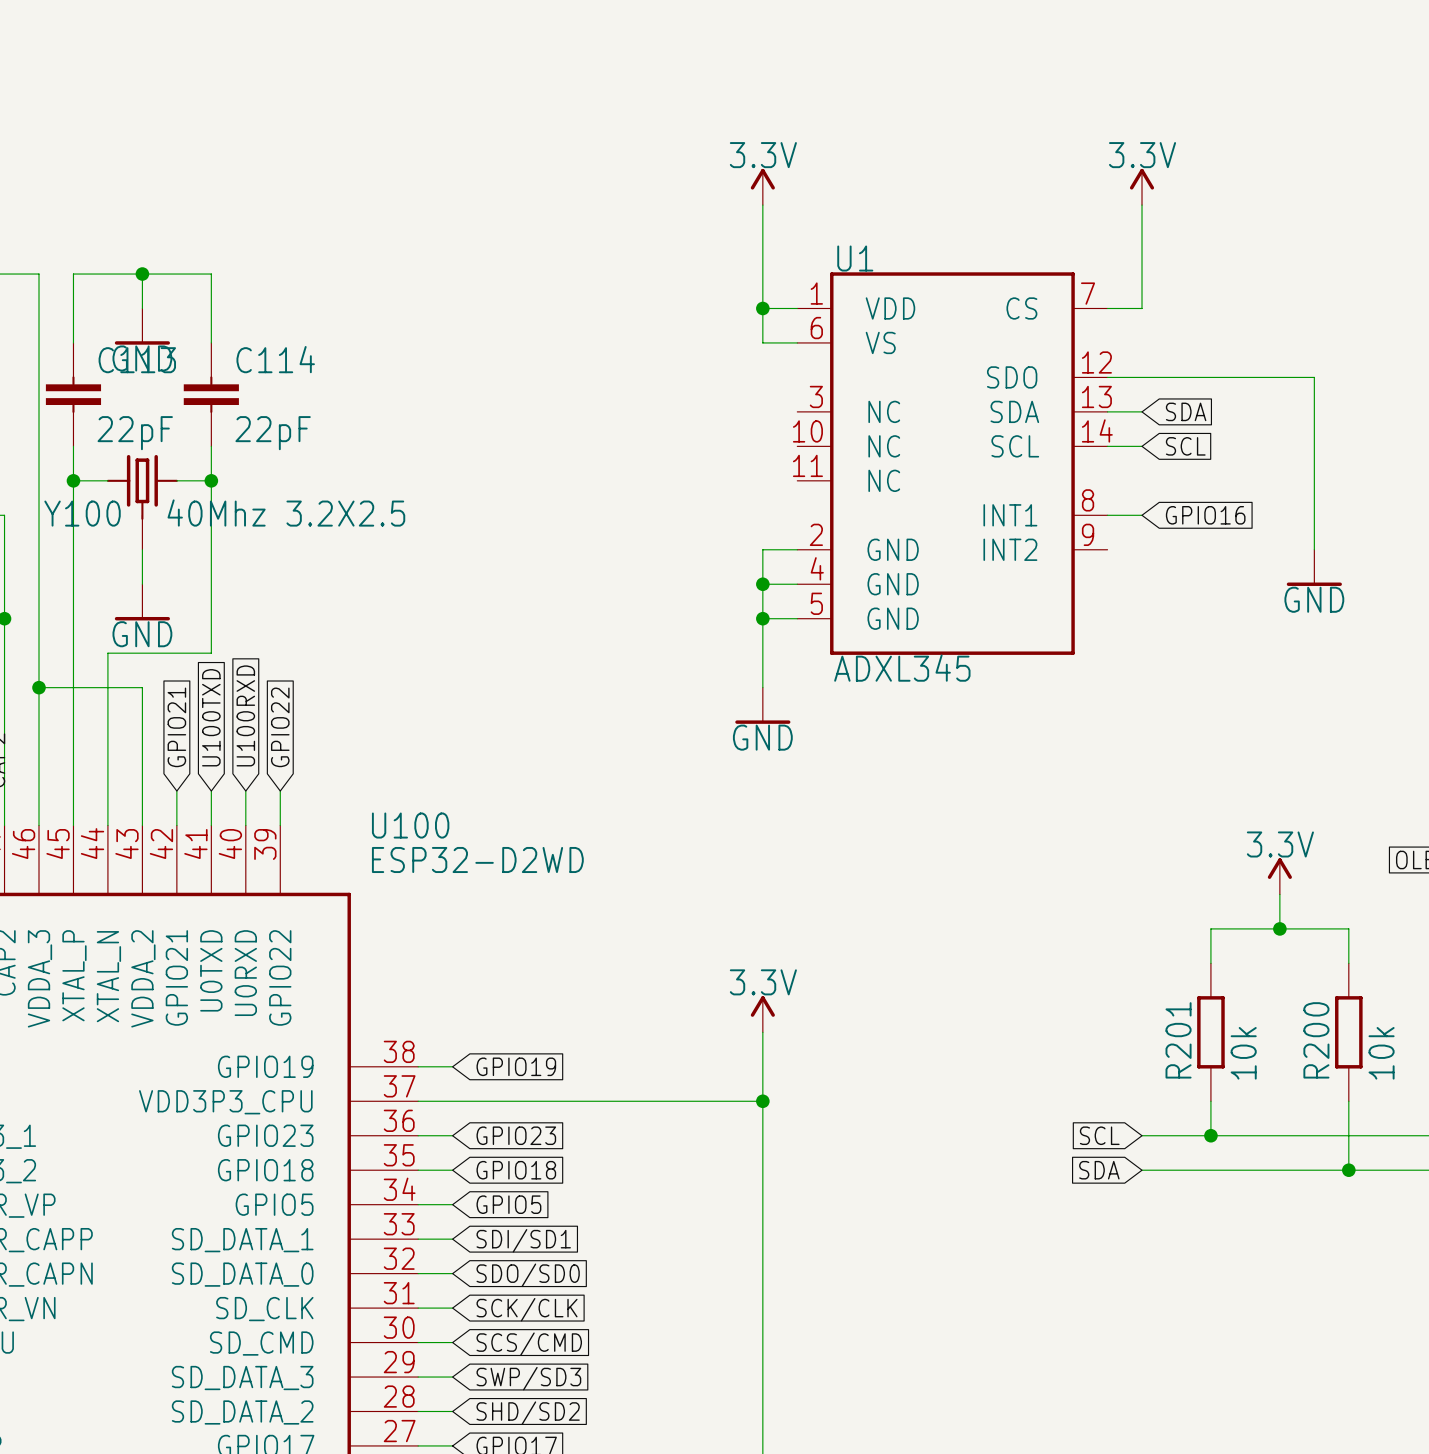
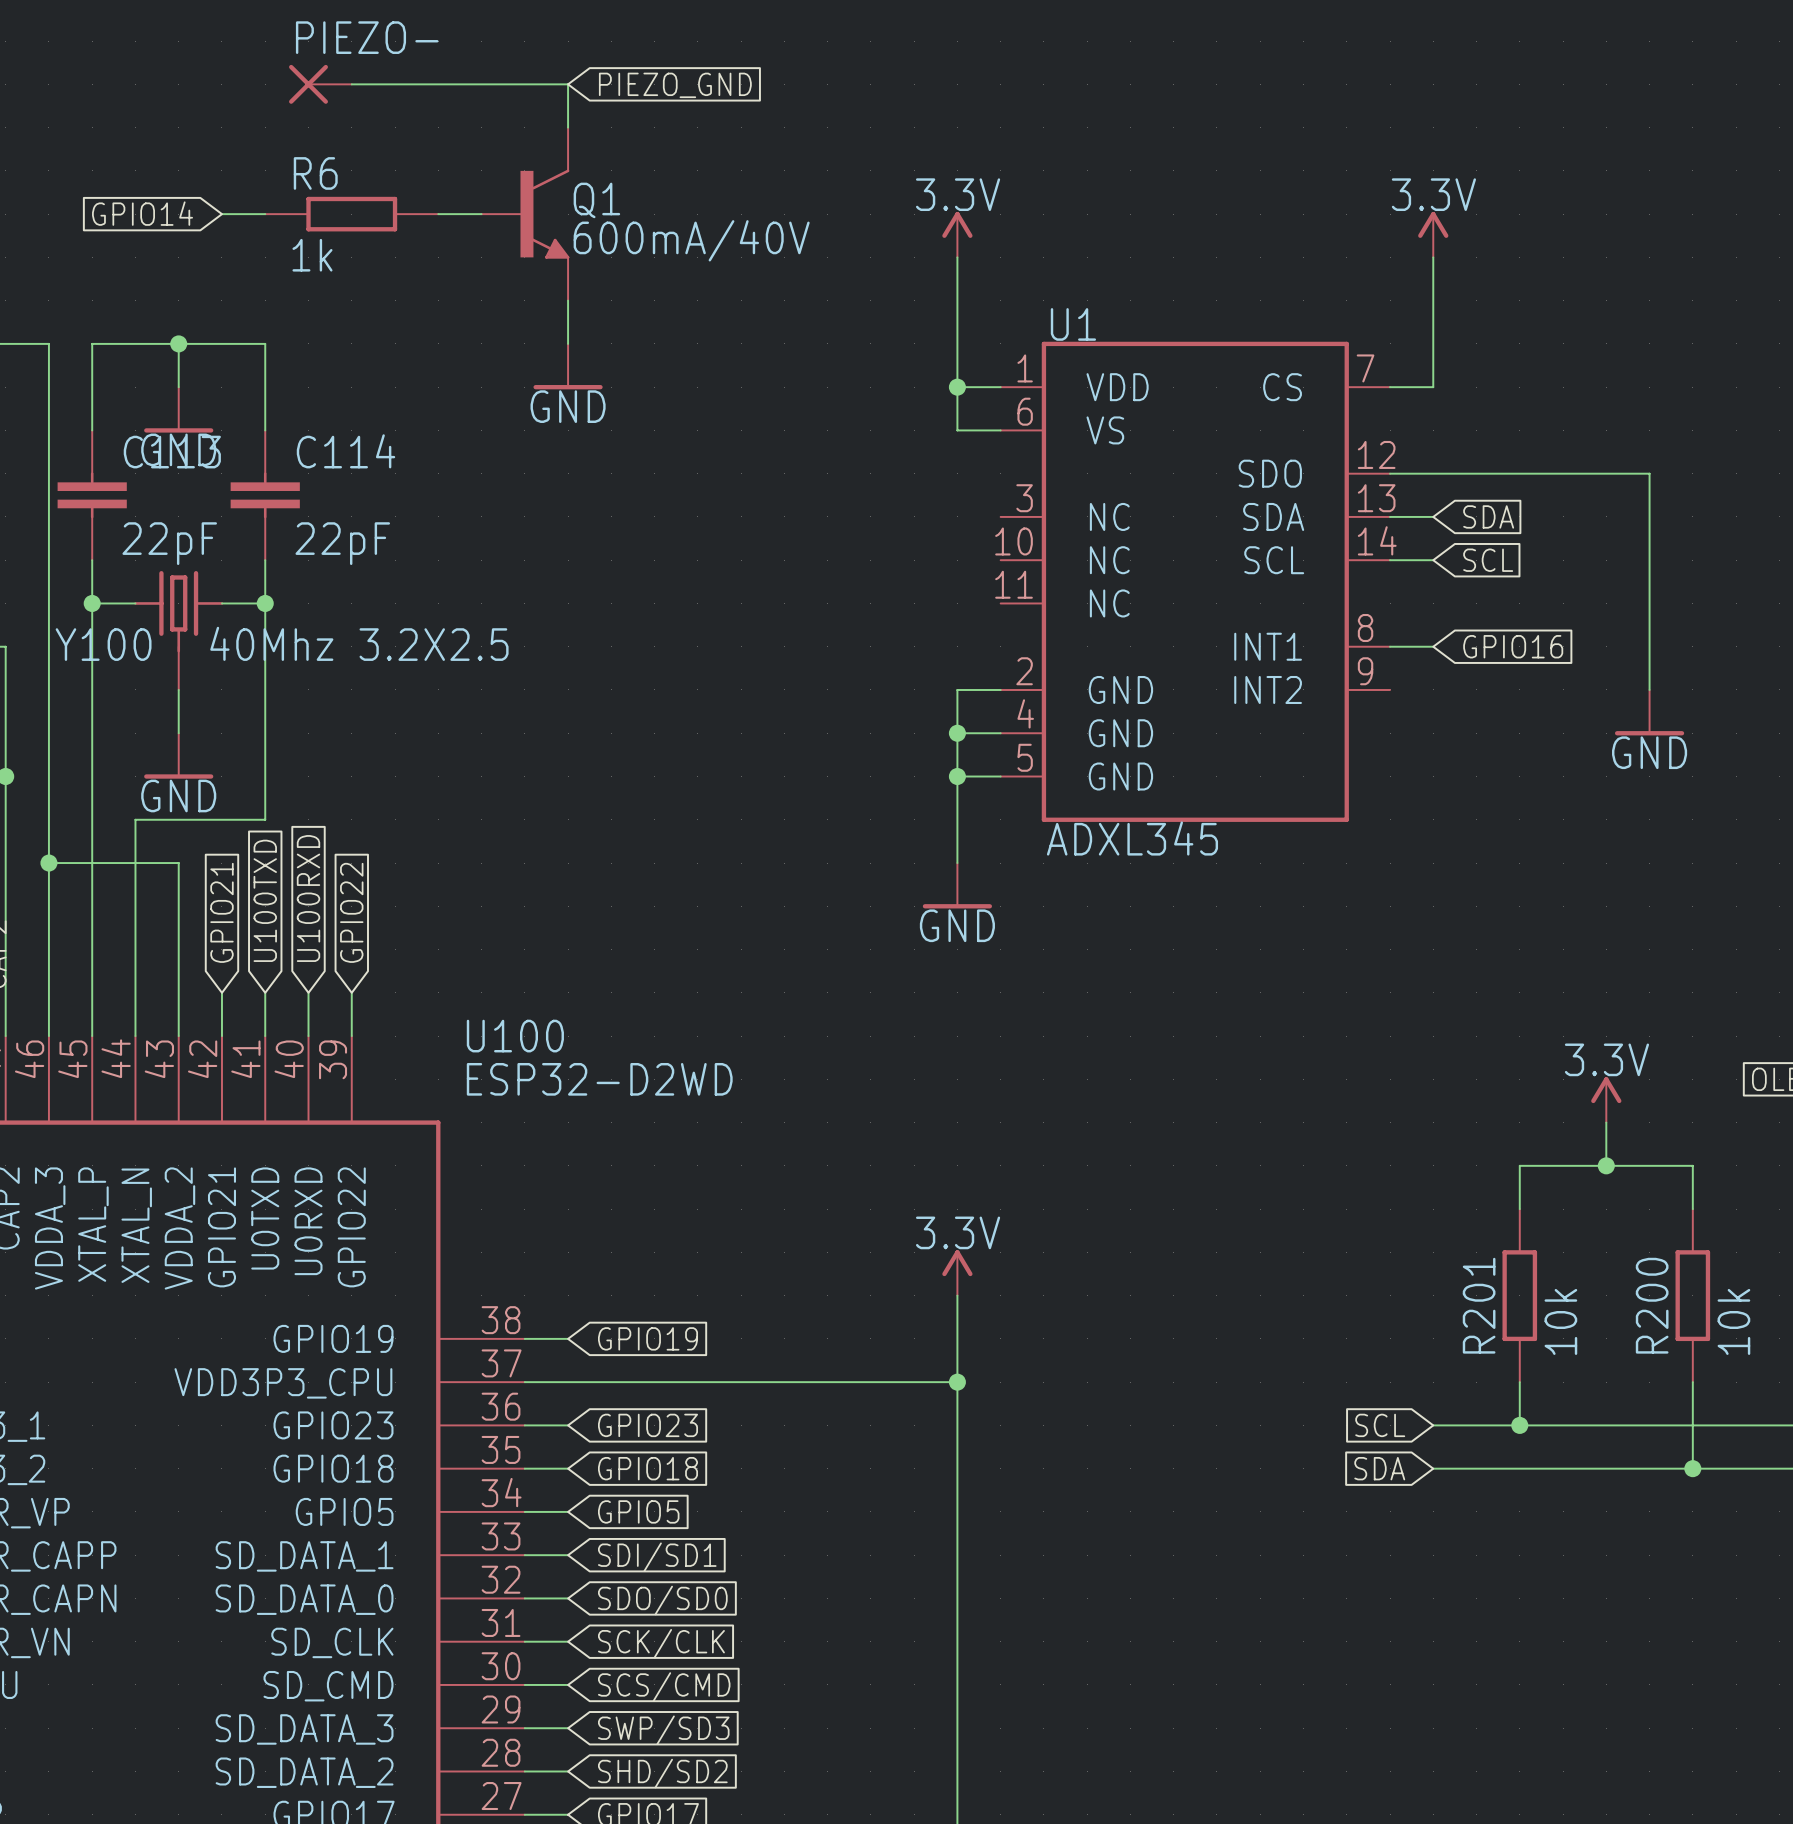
PIEZO-: none -> (320, 84)
wire: none -> (351, 84) (568, 84) (568, 127)
global label: none -> PIEZO_GND (675, 85)
global label: none -> GPIO14 (142, 213)
wire: none -> (221, 214) (265, 214)
R6: none -> 1k (351, 214)
wire: none -> (438, 214) (481, 214)
Q1: none -> 600mA/40V (525, 214)
wire: none -> (568, 300) (568, 343)
power symbol: none -> GND (568, 366)

